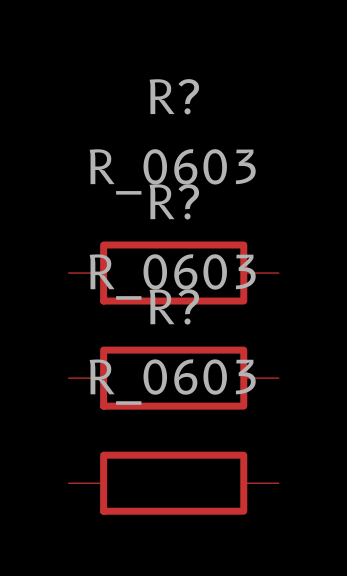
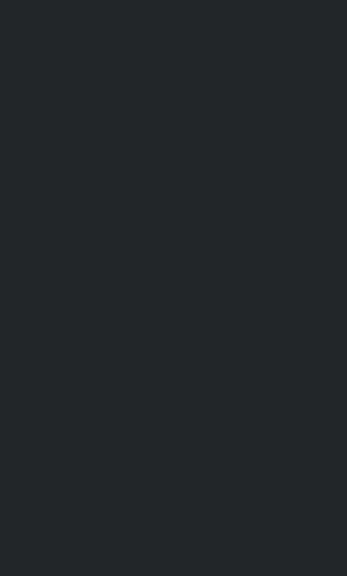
R?: R_0603 (173, 273) -> none
R?: R_0603 (173, 378) -> none
R?: R_0603 (173, 483) -> none

